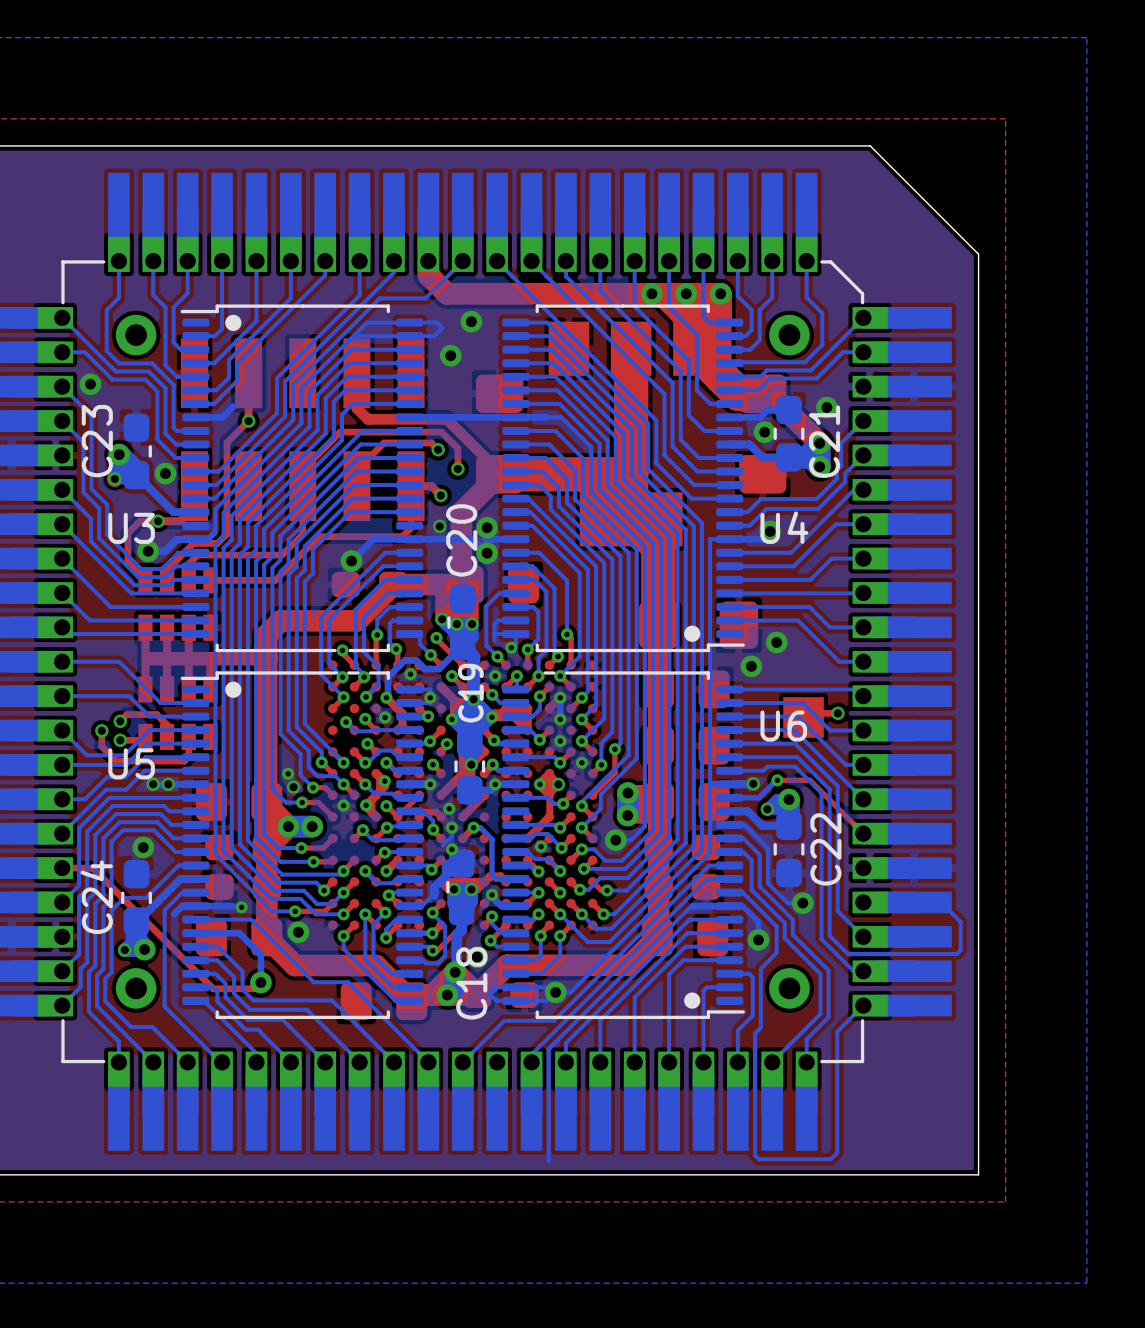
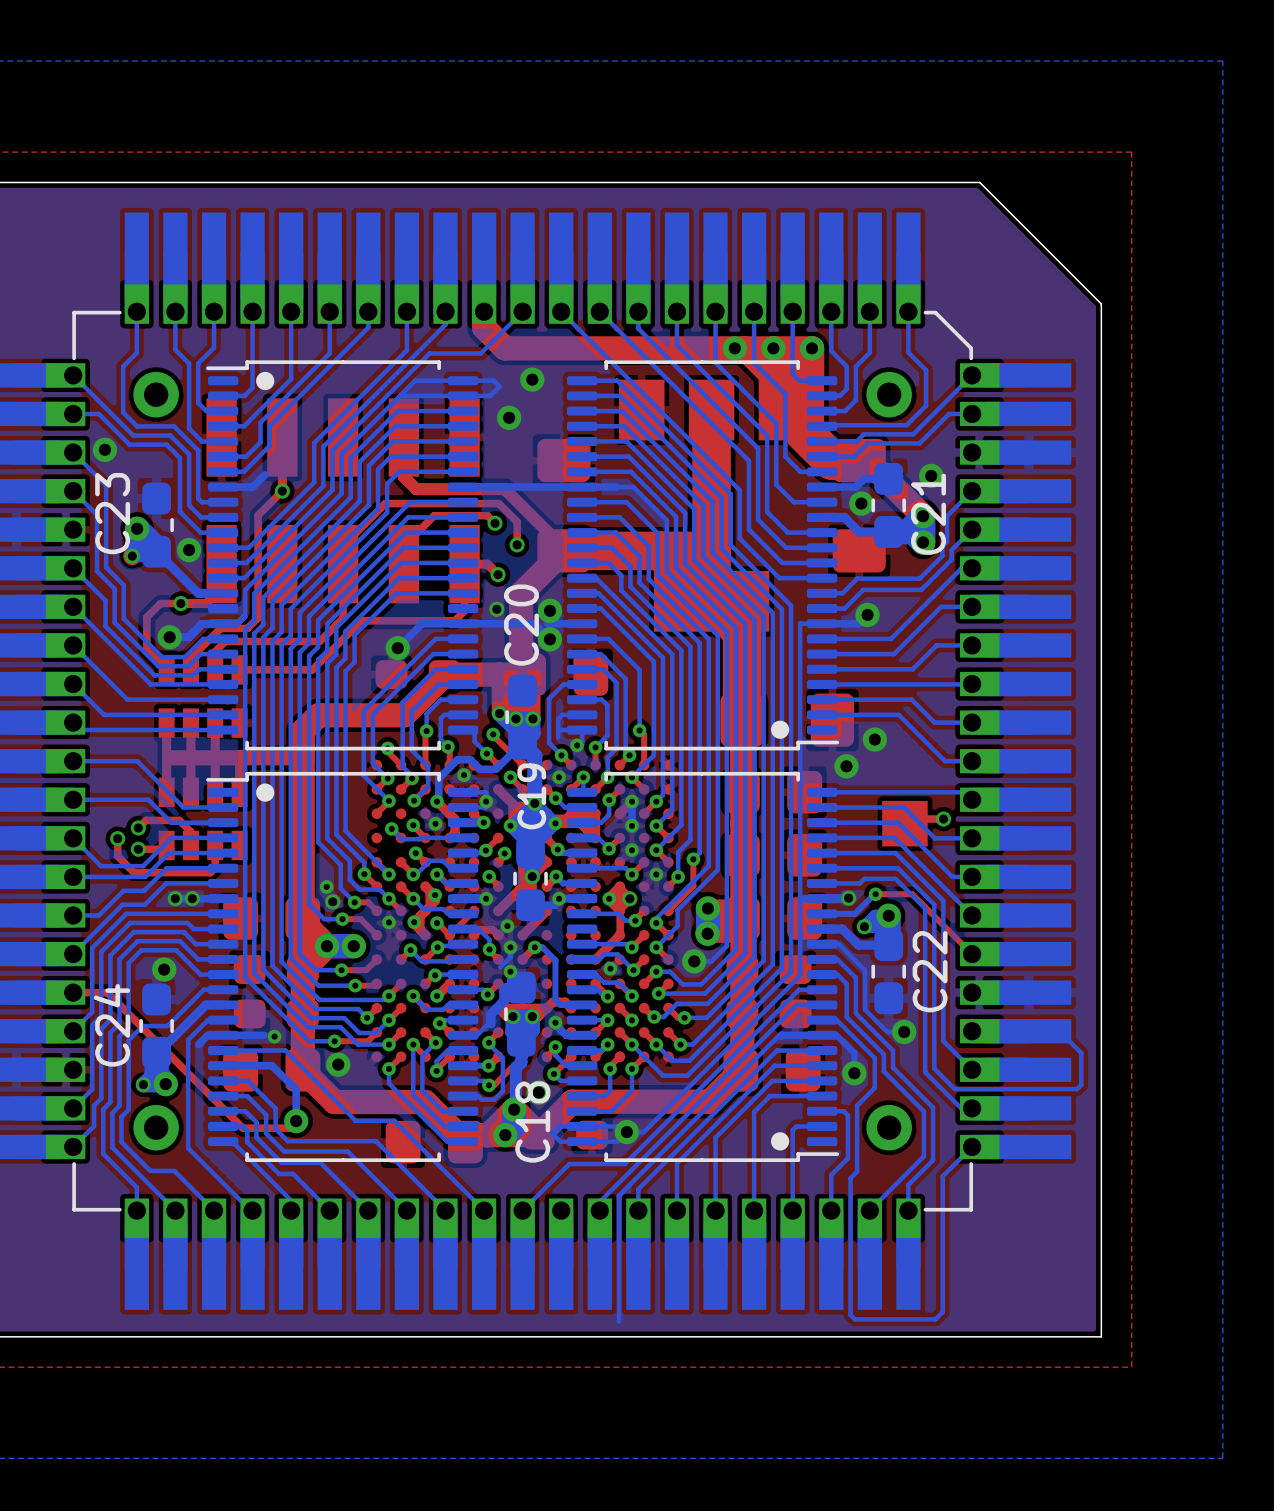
U3: (301, 478) -> none
part: none -> (342, 555)
U4 name: U4 (784, 527) -> none
U5: (301, 845) -> none
part: none -> (342, 966)
U6: (623, 845) -> none
part: none -> (703, 966)

